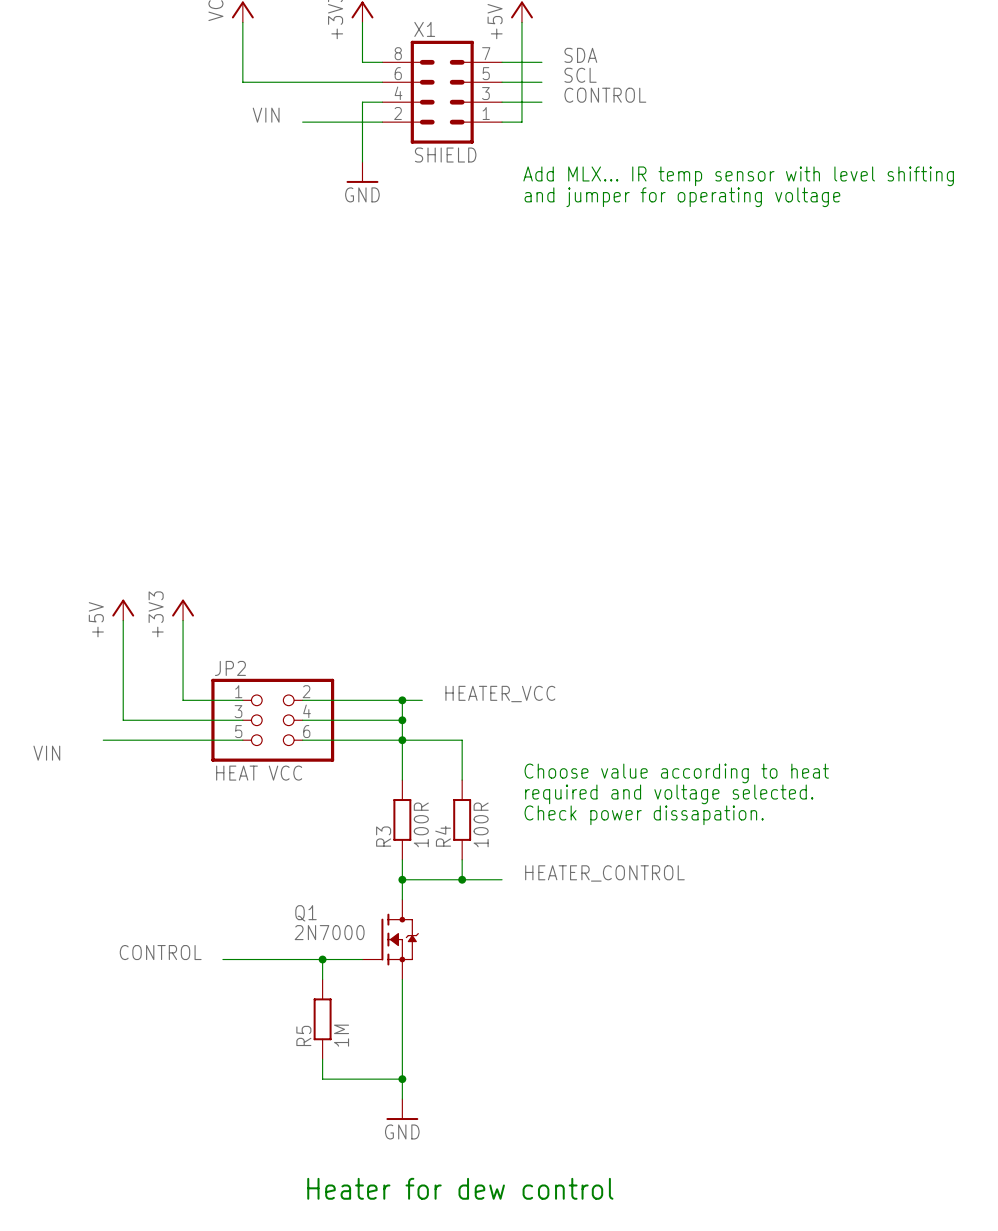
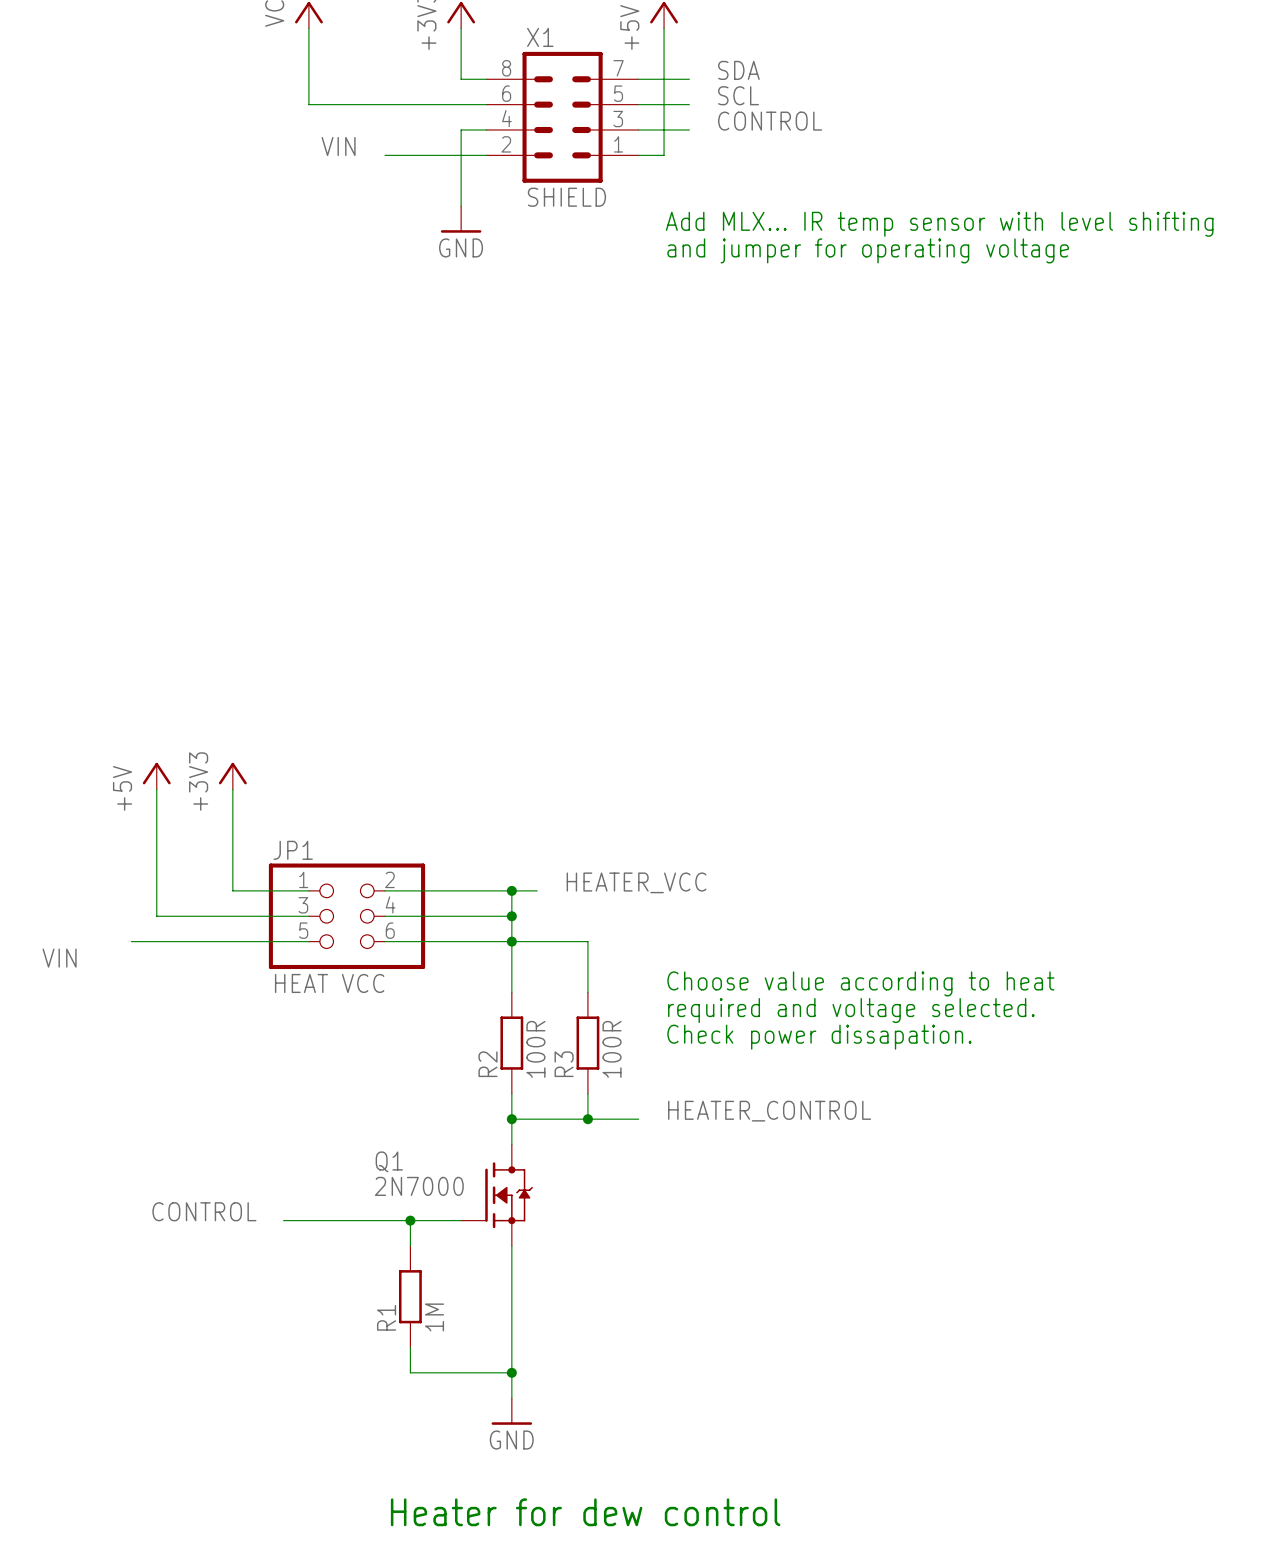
JP2 name: JP2 (230, 668) -> JP1 (293, 850)
R3 name: R3 (383, 836) -> R2 (488, 1064)
R4 name: R4 (443, 836) -> R3 (564, 1064)
R5 name: R5 (303, 1035) -> R1 (386, 1317)

